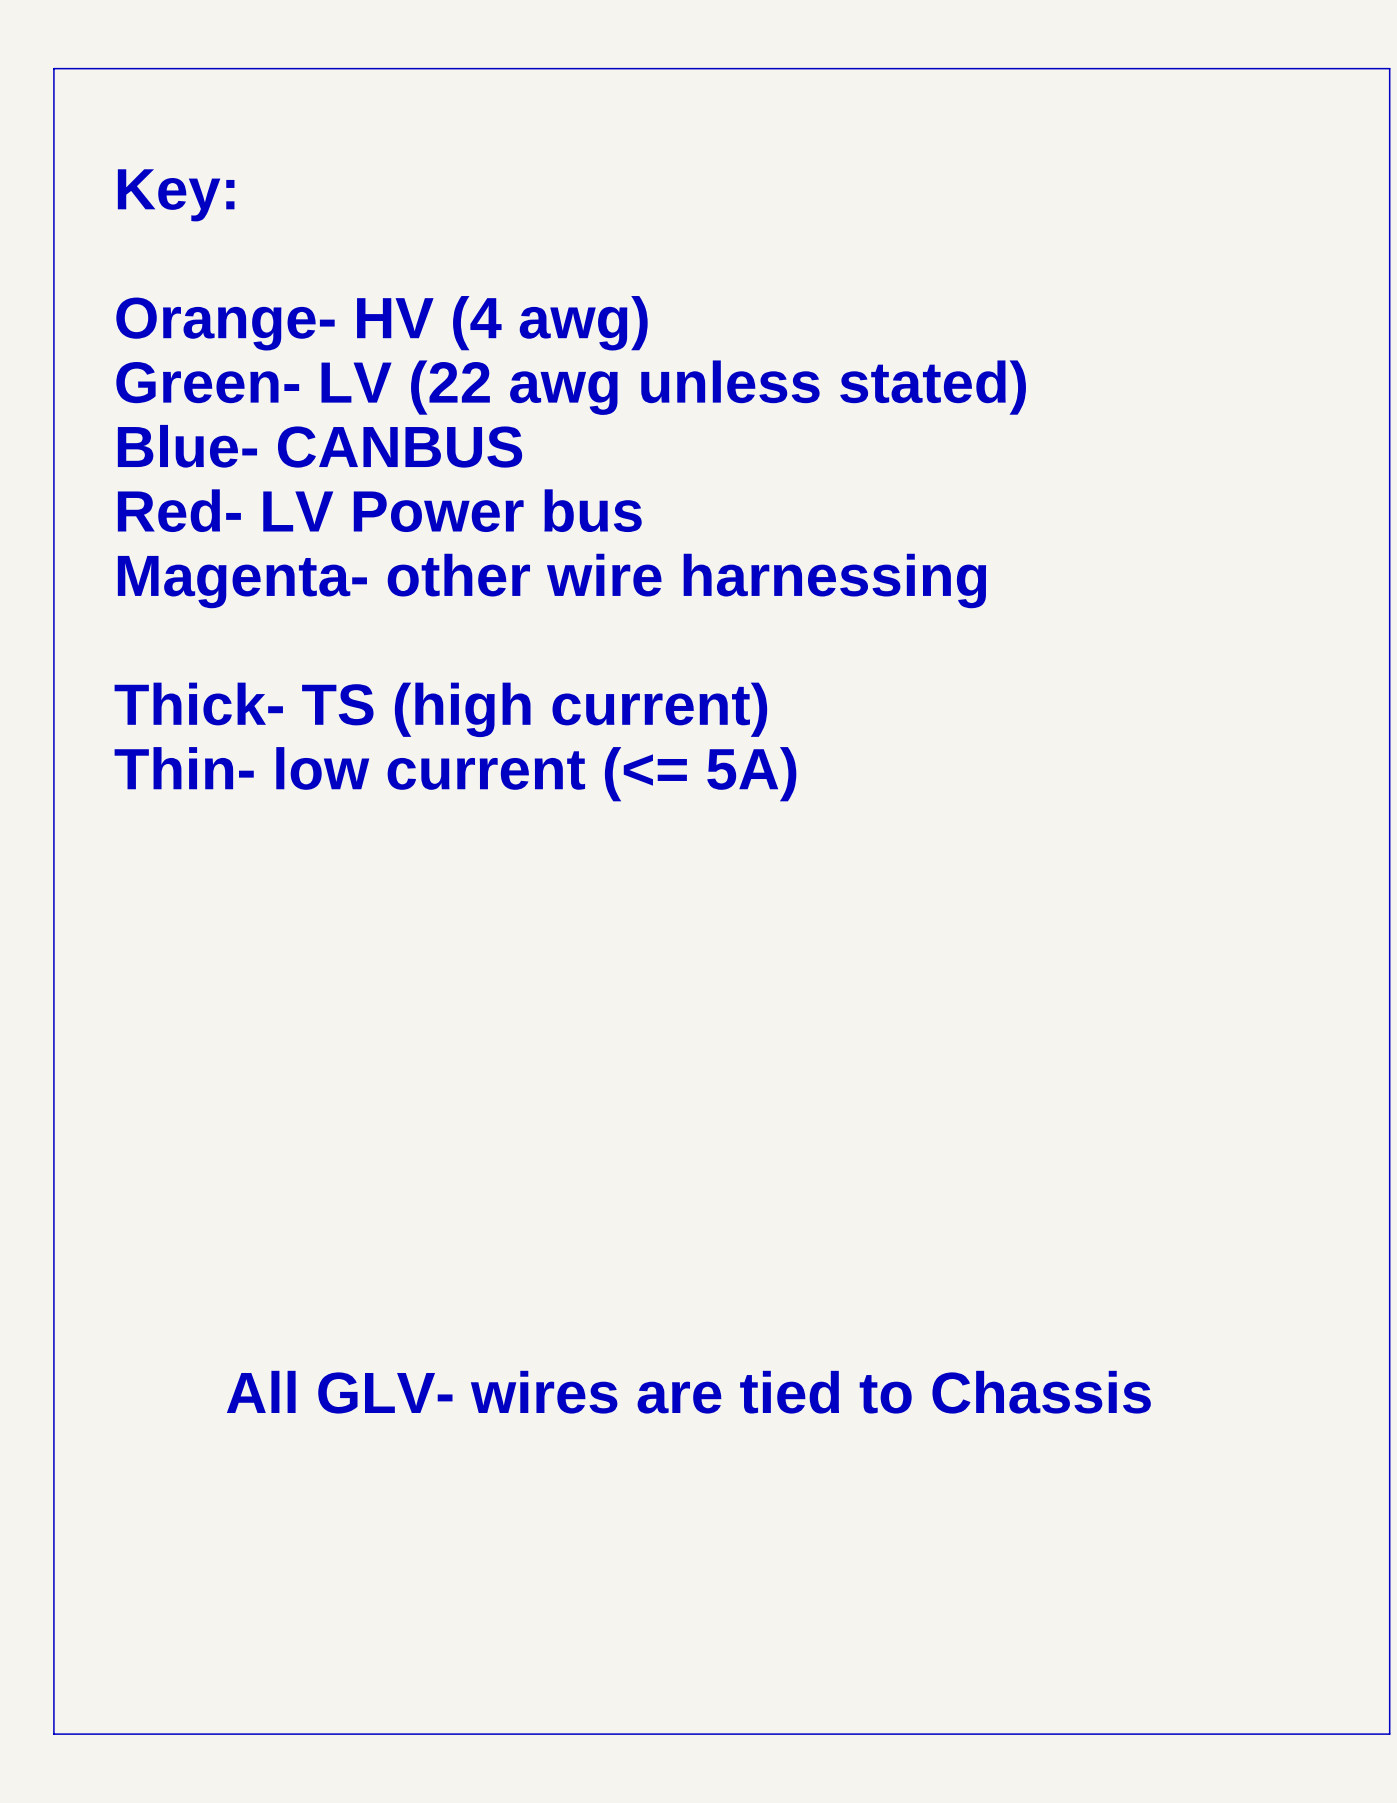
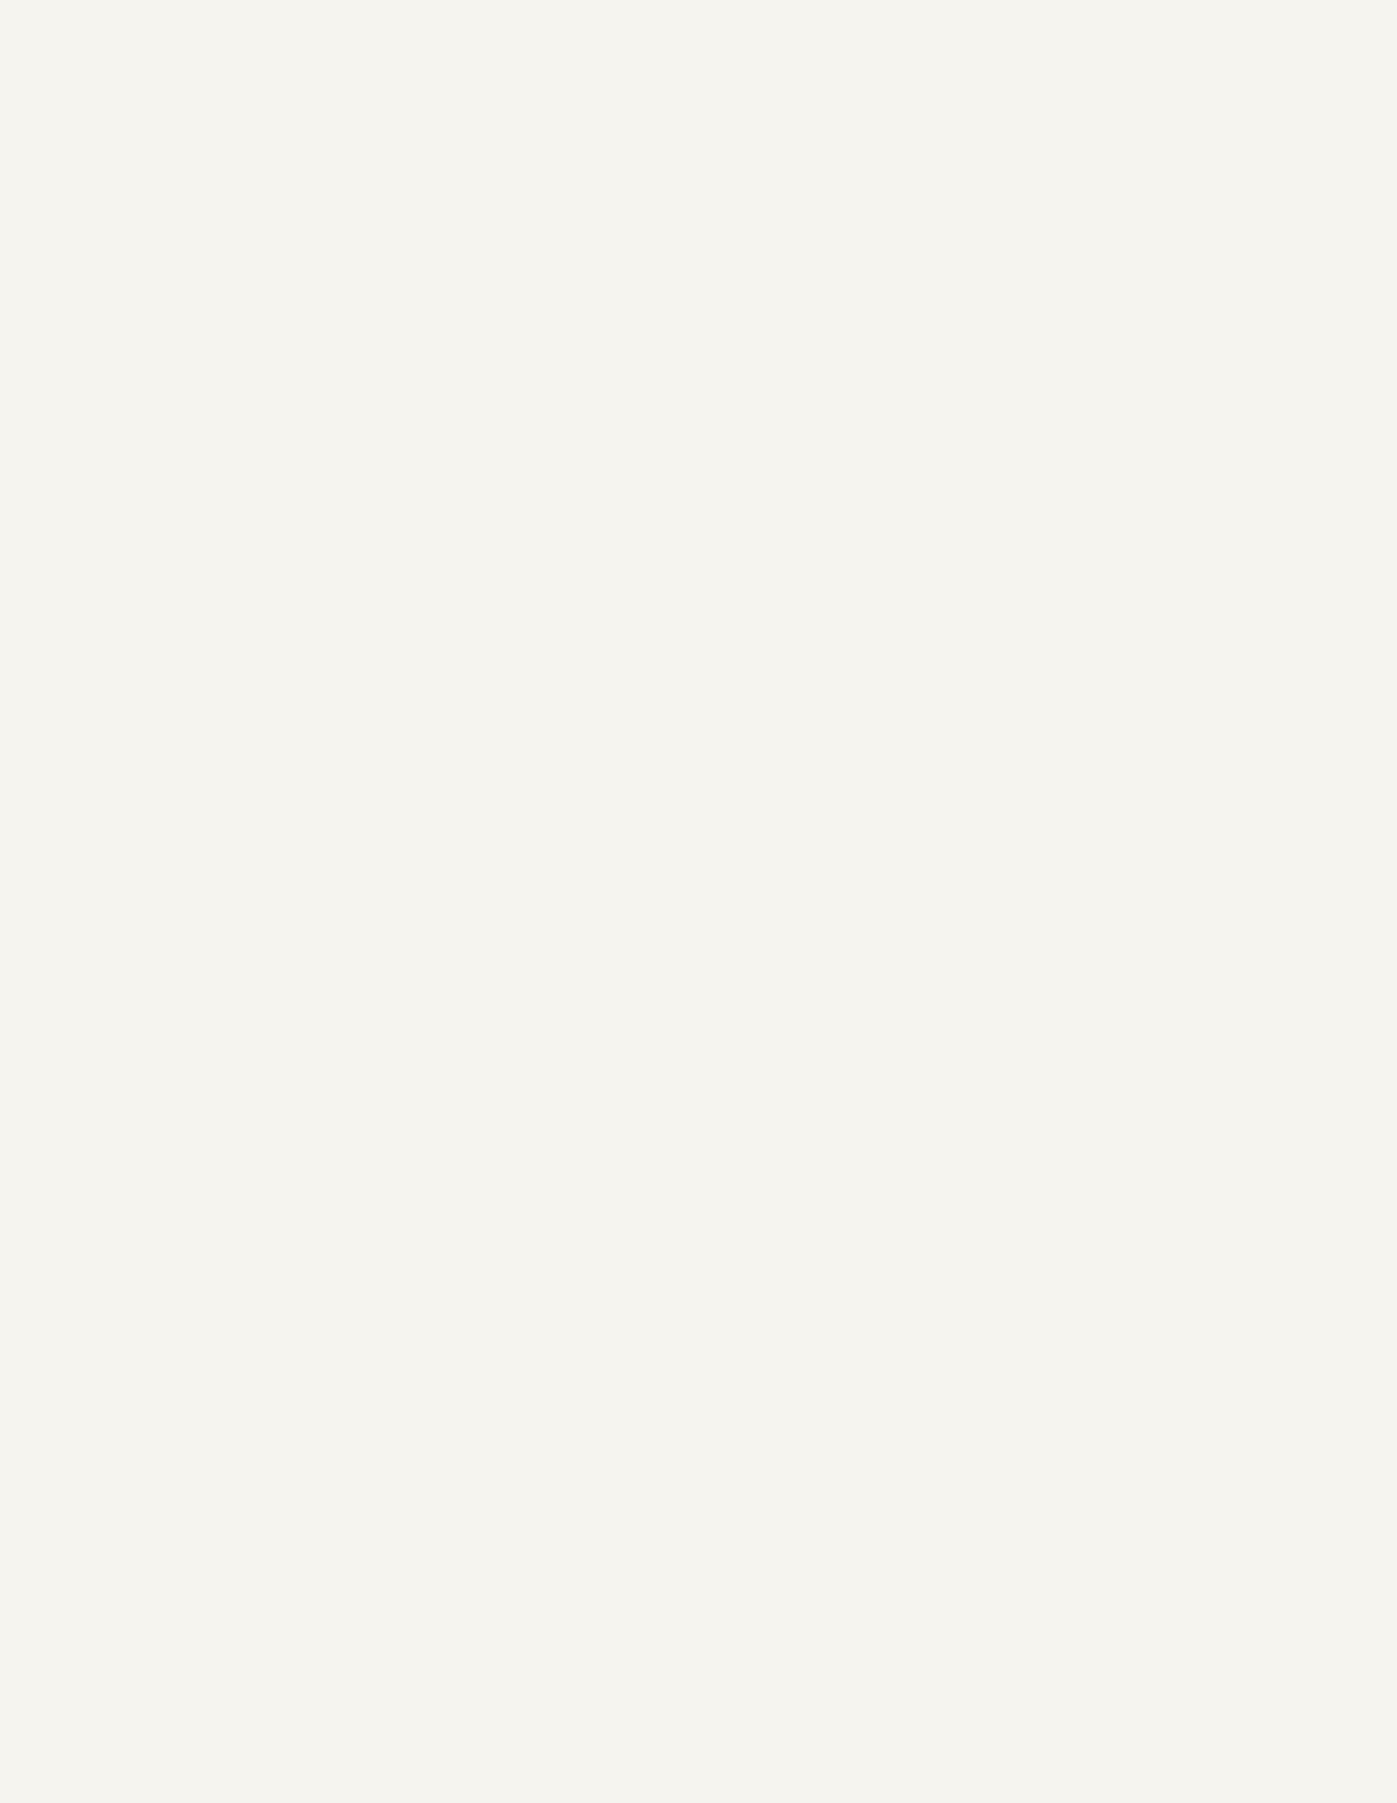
line: (53, 68) (1389, 68) (1389, 1734) (53, 1734) (53, 68) -> none
text: Key: (176, 195) -> none
text: Orange- HV (4 awg) (382, 323) -> none
text: Green- LV (22 awg unless stated) (571, 387) -> none
text: Blue- CANBUS (320, 446) -> none
text: Red- LV Power bus (379, 510) -> none
text: Magenta- other wire harnessing (551, 581) -> none
text: Thick- TS (high current) (440, 709) -> none
text: Thin- low current (<= 5A) (455, 774) -> none
text: All GLV- wires are tied to Chassis (688, 1392) -> none

